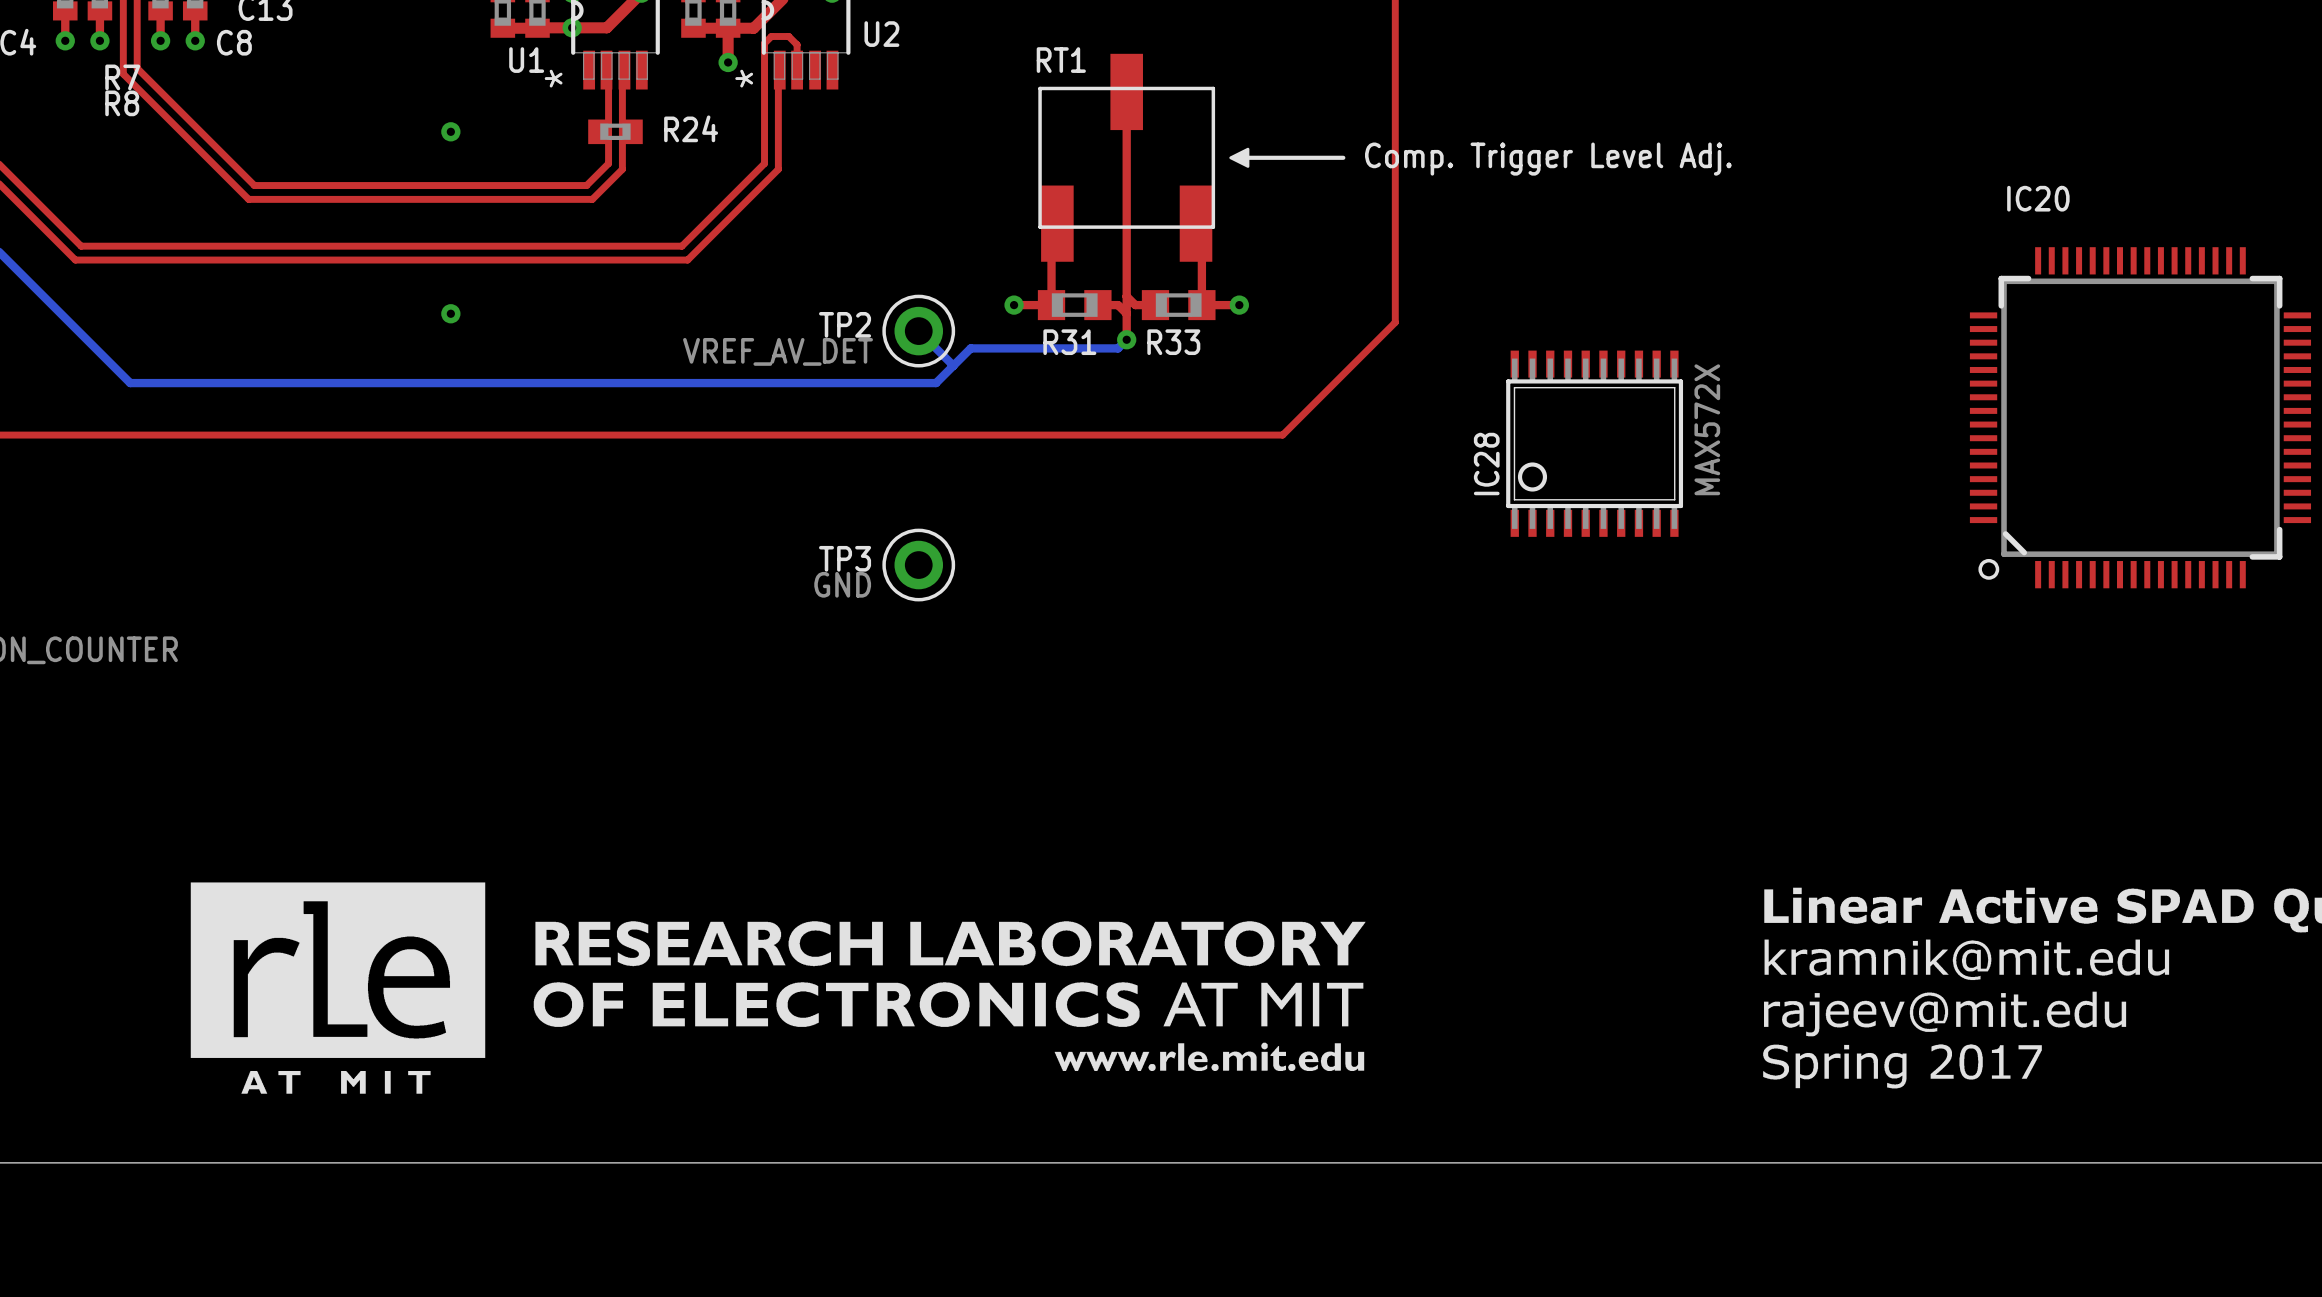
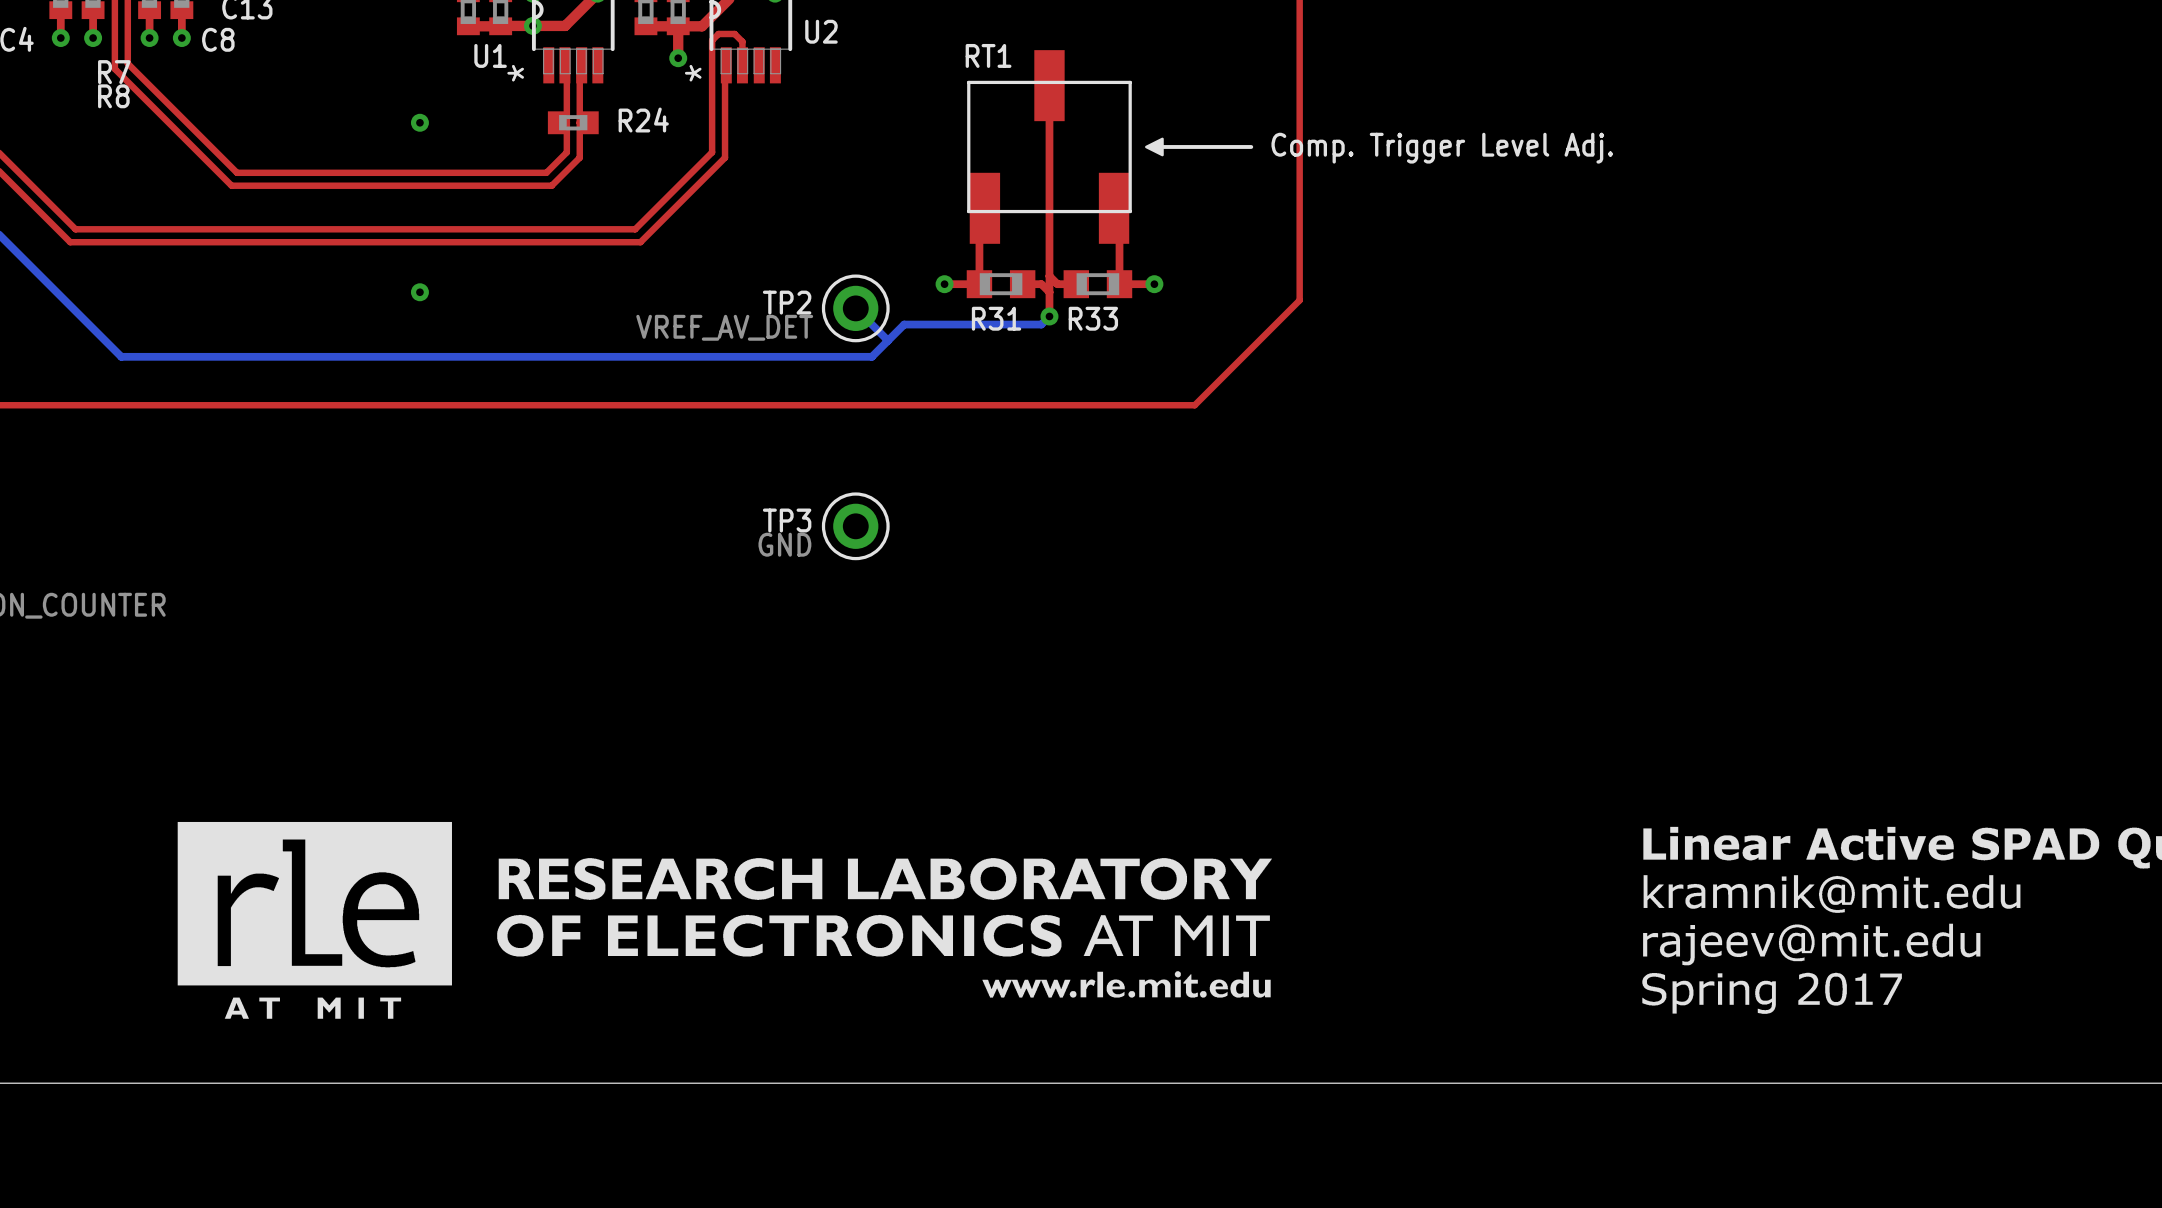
IC20: (2140, 417) -> none
IC28: MAX572X (1594, 443) -> none

